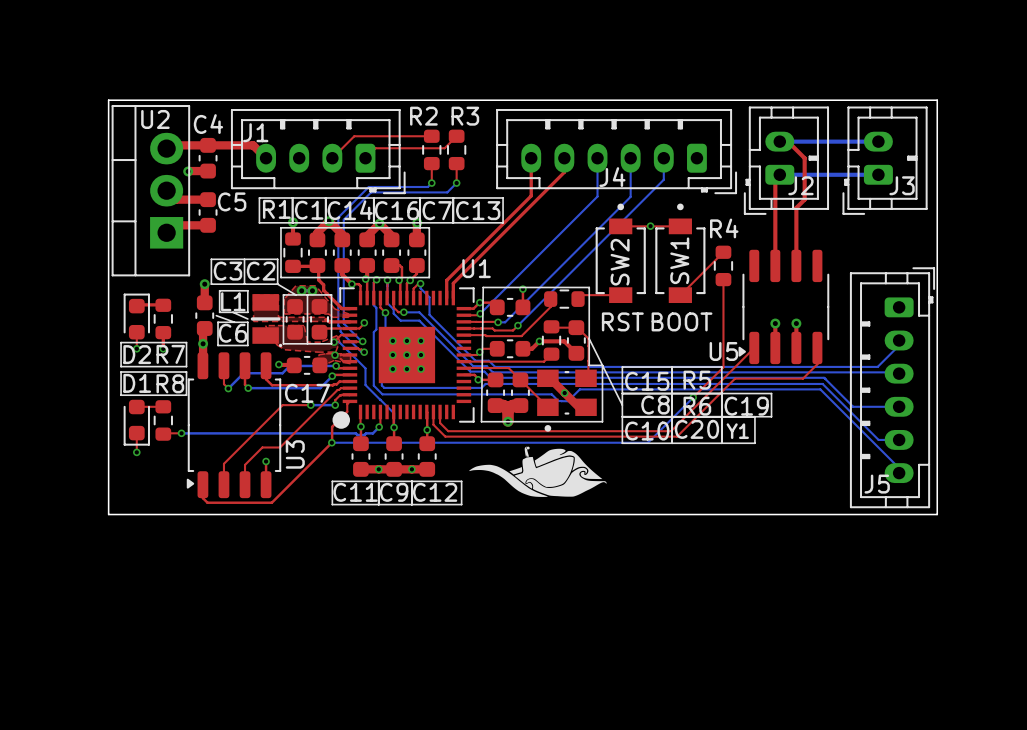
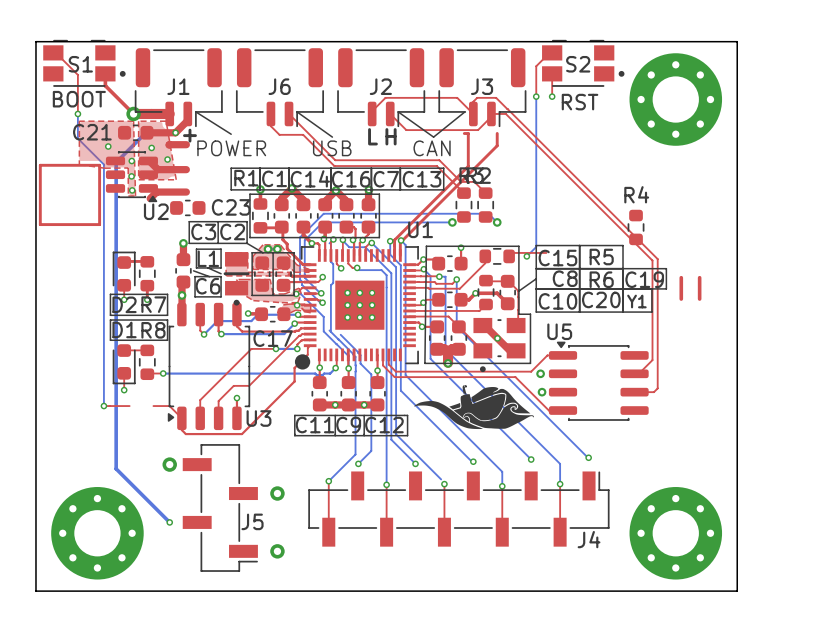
top track: none -> (53, 52) (55, 52) (77, 74) (77, 113)
top track: none -> (552, 52) (549, 52) (536, 66) (536, 96)
S1: none -> (84, 63)
S2: none -> (583, 63)
top track: none -> (105, 73) (105, 85) (133, 113) (169, 113)
top track: none -> (552, 73) (552, 96)
board edge: (108, 100) (937, 100) (937, 514) (108, 514) (108, 100) -> (35, 41) (35, 591) (737, 591) (737, 41) (35, 41)
U2 footprint: [111, 105, 191, 277] -> [105, 151, 158, 203]
J6: none -> (279, 87)
J2 footprint: [743, 106, 830, 215] -> [337, 48, 426, 128]
J3 footprint: [842, 106, 928, 215] -> [438, 48, 527, 128]
J1 footprint: [230, 108, 406, 195] -> [134, 48, 223, 128]
J4 footprint: [496, 108, 738, 195] -> [308, 471, 610, 547]
bottom track: none -> (536, 96) (536, 246) (526, 256)
via: none -> (536, 96)
via: none -> (552, 96)
text: none -> BOOT (79, 99)
U2 name position: U2 (155, 119) -> U2 (156, 211)
part: none -> (675, 99)
J1 name position: J1 (255, 132) -> J1 (178, 86)
line: none -> (195, 111) (231, 134)
line: none -> (297, 111) (332, 137)
line: none -> (398, 111) (433, 137) (464, 111)
bottom track: none -> (77, 113) (77, 138) (103, 164) (103, 406)
via: none -> (77, 113)
via: none -> (133, 113)
top track: none -> (187, 113) (187, 120) (175, 132) (144, 132)
top track: none -> (270, 113) (270, 126) (279, 134) (303, 134) (334, 166) (436, 166) (463, 193)
top track: none -> (289, 113) (335, 160) (439, 160) (461, 181) (474, 181) (485, 193)
top track: none -> (372, 113) (372, 111) (385, 97) (457, 97) (473, 113) (473, 101) (477, 97) (496, 97) (657, 259) (657, 388) (653, 392) (634, 392)
top track: none -> (390, 113) (406, 130) (478, 130) (491, 116) (491, 113) (505, 113) (652, 260) (652, 360) (638, 373) (634, 373)
top track: (431, 136) (354, 136) (332, 158) -> none
top track: (456, 136) (444, 148) (375, 148) (365, 158) -> none
top track: (779, 141) (788, 141) (804, 158) (804, 199) (796, 207) (796, 265) -> none
bottom track: (779, 141) (878, 141) -> none
top zone outline: none -> (79, 121) (79, 164) (104, 168) (128, 168) (128, 196) (135, 195) (133, 121) (79, 121)
top zone outline: none -> (138, 121) (166, 121) (176, 179) (138, 179) (138, 121)
top track: (166, 148) (169, 145) (253, 145) (266, 158) -> none
R2 position: (431, 149) -> (485, 205)
R3 position: (456, 149) -> (463, 205)
C21: none -> (135, 132)
bottom track: none -> (175, 132) (145, 132) (116, 162) (116, 468) (169, 522)
via: none -> (175, 132)
C4: (208, 158) -> none
bottom track: (597, 158) (597, 196) (480, 313) -> (531, 459) (430, 358) (430, 275) (423, 269)
bottom track: (630, 158) (630, 196) (505, 322) -> (560, 484) (560, 463) (445, 349) (445, 276)
bottom track: (663, 158) (663, 179) (517, 325) -> (588, 458) (456, 326) (456, 279)
text: none -> + (189, 135)
text: none -> L (372, 136)
text: none -> H (391, 136)
top track: (431, 163) (431, 183) -> none
top track: (456, 163) (456, 183) -> none
via: (188, 171) -> none
via: none -> (108, 146)
via: none -> (151, 147)
top track: (779, 174) (775, 179) (775, 265) -> none
bottom track: (779, 174) (878, 174) -> none
text: none -> POWER (231, 148)
text: none -> USB (332, 148)
text: none -> CAN (432, 148)
J4 name position: J4 (612, 177) -> J4 (589, 539)
bottom track: (431, 183) (427, 186) (368, 186) (338, 217) (338, 277) -> (497, 222) (488, 213) (323, 213) (300, 237)
via: (431, 183) -> none
bottom track: (456, 183) (447, 192) (371, 192) (343, 219) (343, 280) -> (452, 219) (452, 222) (322, 222) (304, 240)
via: (456, 183) -> none
via: none -> (167, 159)
via: none -> (131, 161)
top track: none -> (40, 165) (99, 165) (99, 224) (40, 224) (40, 165)
via: none -> (131, 176)
C5: (208, 212) -> none
via: none -> (132, 190)
top track: (620, 226) (680, 226) -> none
via: (650, 226) -> none
C23: none -> (187, 207)
U5 footprint: [738, 249, 830, 365] -> [548, 341, 649, 421]
top track: (723, 252) (680, 295) -> none
SW2: (620, 253) -> none
SW1: (680, 253) -> none
via: none -> (452, 222)
via: none -> (497, 222)
J5 footprint: [849, 267, 936, 509] -> [182, 444, 258, 572]
top track: (723, 279) (723, 367) (693, 397) -> none
bottom track: (387, 280) (387, 303) (400, 320) (419, 320) (470, 371) (484, 371) (490, 377) (824, 377) (853, 406) (904, 406) -> none
bottom track: none -> (401, 240) (405, 245) (405, 375) (502, 471) (502, 486)
via: none -> (401, 240)
bottom track: none -> (343, 241) (349, 247) (365, 247) (391, 273) (391, 439) (415, 463)
bottom track: none -> (390, 241) (390, 254) (400, 265) (400, 390) (473, 461)
via: none -> (390, 241)
bottom track: (420, 283) (420, 288) (429, 297) (429, 314) (475, 360) (488, 360) (495, 366) (877, 366) (904, 340) -> (371, 242) (396, 267) (396, 434) (441, 479)
L1 footprint: [250, 294, 283, 348] -> [223, 252, 250, 306]
via: none -> (526, 256)
bottom track: (403, 311) (419, 312) (473, 366) (486, 366) (492, 372) (904, 373) -> none
bottom track: (382, 314) (385, 312) (385, 328) (381, 331) (381, 385) (384, 387) (481, 387) (485, 383) (822, 383) (878, 439) (904, 439) -> none
bottom track: none -> (358, 270) (381, 270) (386, 275) (386, 484)
text position: RST (622, 321) -> RST (580, 102)
text: BOOT (682, 321) -> none
via: (775, 323) -> none
via: (796, 323) -> none
line: (589, 338) (622, 405) -> (518, 291) (536, 278)
top track: (754, 347) (671, 431) (603, 431) -> (563, 355) (547, 355) (531, 371)
top track: (817, 347) (817, 364) (803, 378) (735, 378) (677, 436) (445, 436) (433, 424) -> (563, 410) (548, 410) (515, 377) (394, 377) (382, 365)
U5 name position: U5 (723, 351) -> U5 (559, 331)
line: (672, 367) (672, 443) -> (579, 245) (579, 312)
R5 name position: R5 (697, 380) -> R5 (601, 257)
C15 name position: C15 (647, 381) -> C15 (557, 258)
bottom track: none -> (340, 334) (360, 355) (360, 363) (371, 374) (371, 450) (358, 463)
line: (622, 393) (771, 393) (771, 416) (622, 416) -> (536, 268) (666, 268) (666, 288) (536, 288)
bottom track: (382, 394) (551, 394) (558, 401) (568, 401) (579, 389) (820, 389) (899, 468) (899, 473) -> (338, 339) (355, 356) (355, 454) (328, 481)
bottom track: (693, 397) (647, 442) (331, 442) -> none
via: (693, 397) -> none
C8 name position: C8 (655, 405) -> C8 (565, 278)
R6 name position: R6 (697, 406) -> R6 (601, 279)
C19 name position: C19 (746, 406) -> C19 (644, 279)
line: (754, 416) (754, 443) (622, 443) (622, 367) (721, 367) (721, 443) -> (651, 288) (651, 312) (536, 312) (536, 245) (623, 245) (623, 312)
C20 name position: C20 (696, 429) -> C20 (601, 299)
C10 name position: C10 (647, 431) -> C10 (557, 301)
Y1 name position: Y1 (737, 431) -> Y1 (636, 301)
via: none -> (540, 373)
via: (331, 442) -> none
U3 name rotation: 0° (295, 454) -> 90° clockwise (258, 418)
via: none -> (542, 392)
top track: none -> (103, 406) (129, 406)
via: none -> (103, 406)
top track: none -> (153, 406) (169, 406) (181, 418)
J5 name position: J5 (877, 484) -> J5 (252, 521)
via: none -> (588, 457)
via: none -> (531, 459)
via: none -> (473, 461)
via: none -> (358, 463)
via: none -> (415, 463)
via: none -> (169, 464)
top track: none -> (328, 479) (328, 532)
via: none -> (328, 481)
top track: none -> (386, 484) (386, 532)
via: none -> (386, 484)
top track: none -> (444, 484) (444, 532)
via: none -> (444, 484)
top track: none -> (560, 484) (560, 532)
via: none -> (560, 484)
top track: none -> (502, 486) (502, 532)
via: none -> (502, 486)
via: none -> (277, 493)
via: none -> (169, 522)
part: none -> (97, 533)
part: none -> (675, 533)
via: none -> (277, 551)

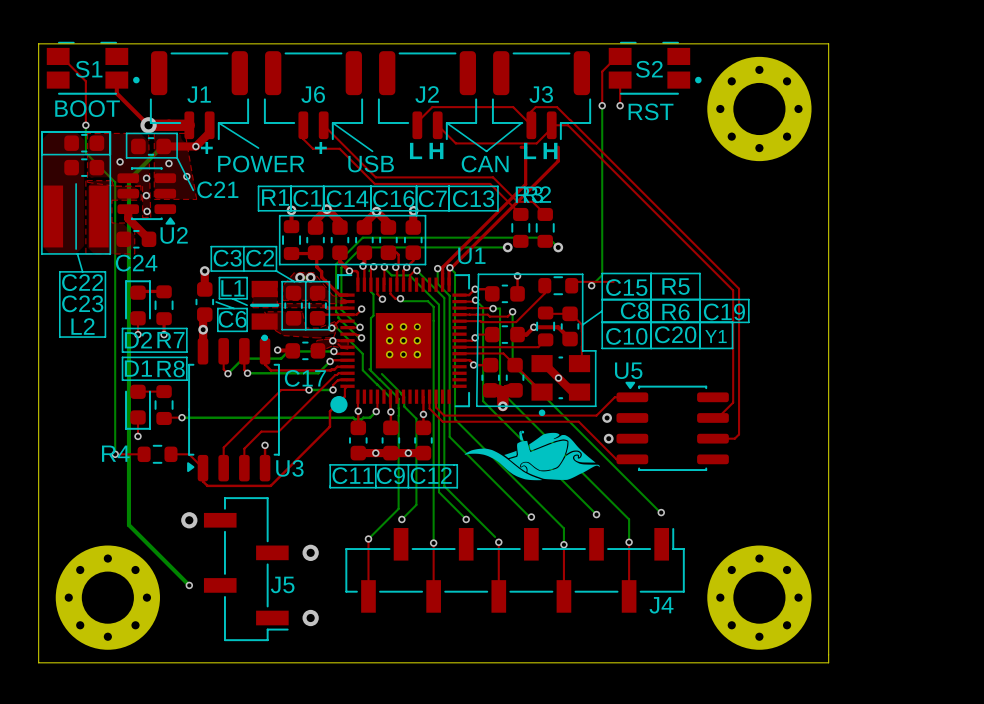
line: none -> (41, 131) (110, 131) (110, 253) (41, 253) (41, 131)
C22: none -> (84, 143)
C21 name position: C21 (92, 132) -> C21 (217, 189)
text: none -> + (320, 147)
text: none -> L (530, 150)
text: none -> H (550, 150)
line: none -> (41, 154) (110, 154)
line: none -> (177, 157) (193, 190)
line: none -> (177, 157) (177, 133) (126, 133) (126, 157) (177, 157)
top track: (186, 144) (169, 145) -> none
top track: (150, 161) (158, 169) (186, 169) -> none
top zone outline: none -> (85, 180) (111, 180) (113, 186) (140, 186) (141, 200) (111, 200) (111, 223) (134, 223) (134, 253) (85, 253) (85, 180)
top track: (40, 165) (99, 165) (99, 224) (40, 224) (40, 165) -> none
top track: none -> (128, 209) (128, 218) (148, 239)
top track: (186, 192) (156, 192) (150, 198) -> none
L2: none -> (76, 216)
R4 name position: R4 (636, 194) -> R4 (115, 453)
C23 position: (187, 207) -> (84, 167)
C23 name position: C23 (231, 207) -> C23 (82, 303)
C24: none -> (136, 239)
R4 rotation: 0° (636, 227) -> 90° clockwise (157, 454)
R4 position: (636, 227) -> (157, 454)
line: none -> (77, 253) (82, 271)
line: none -> (59, 271) (105, 271) (105, 337) (59, 337) (59, 271)
top track: (681, 277) (681, 299) -> none
top track: (699, 277) (699, 299) -> none

